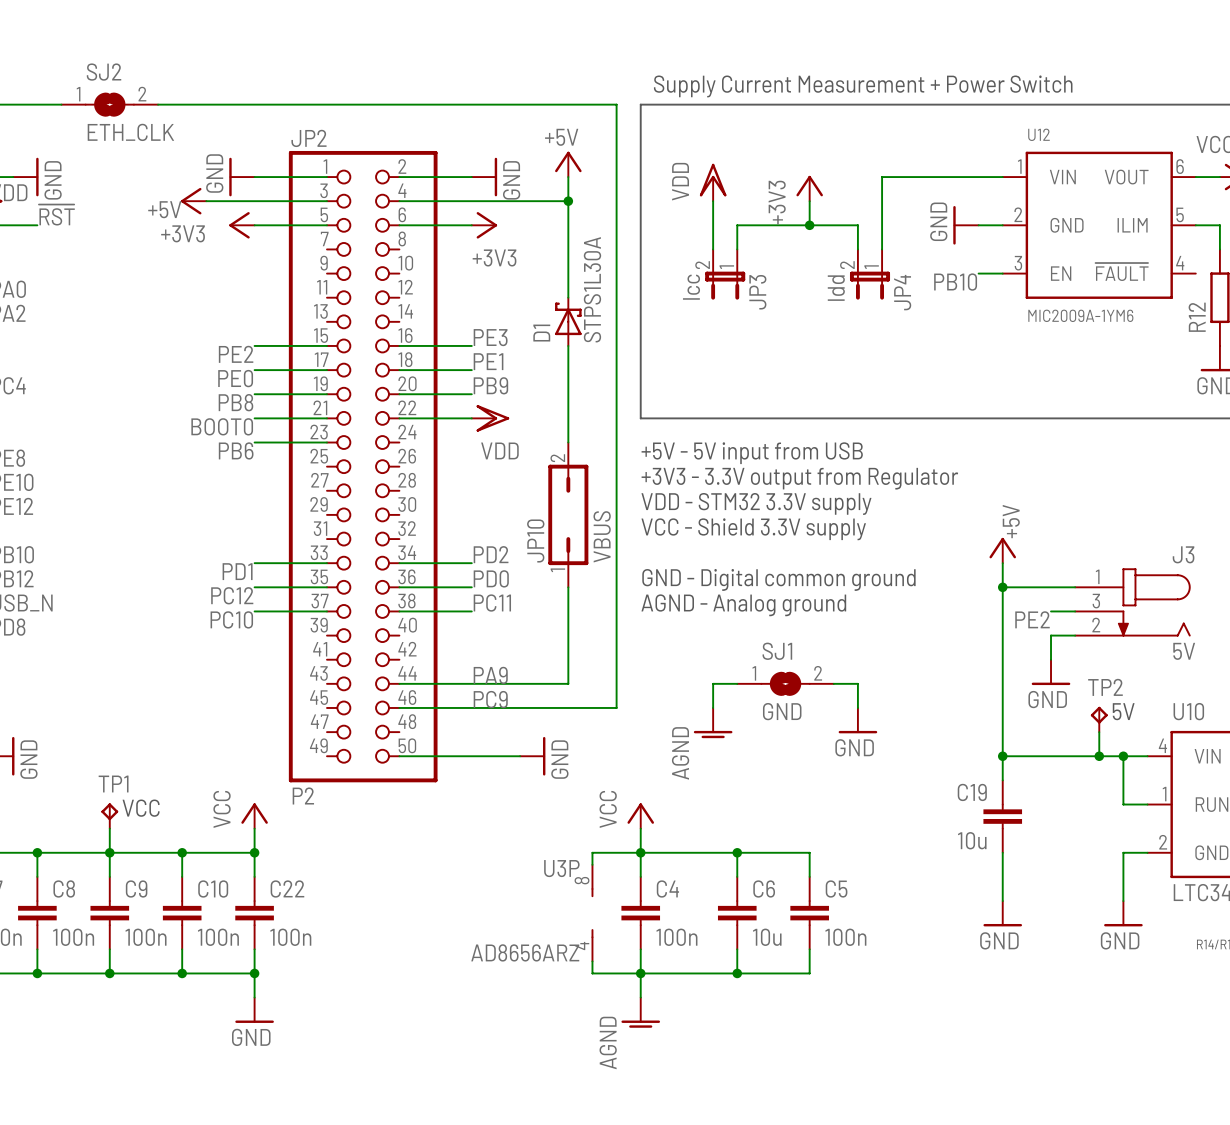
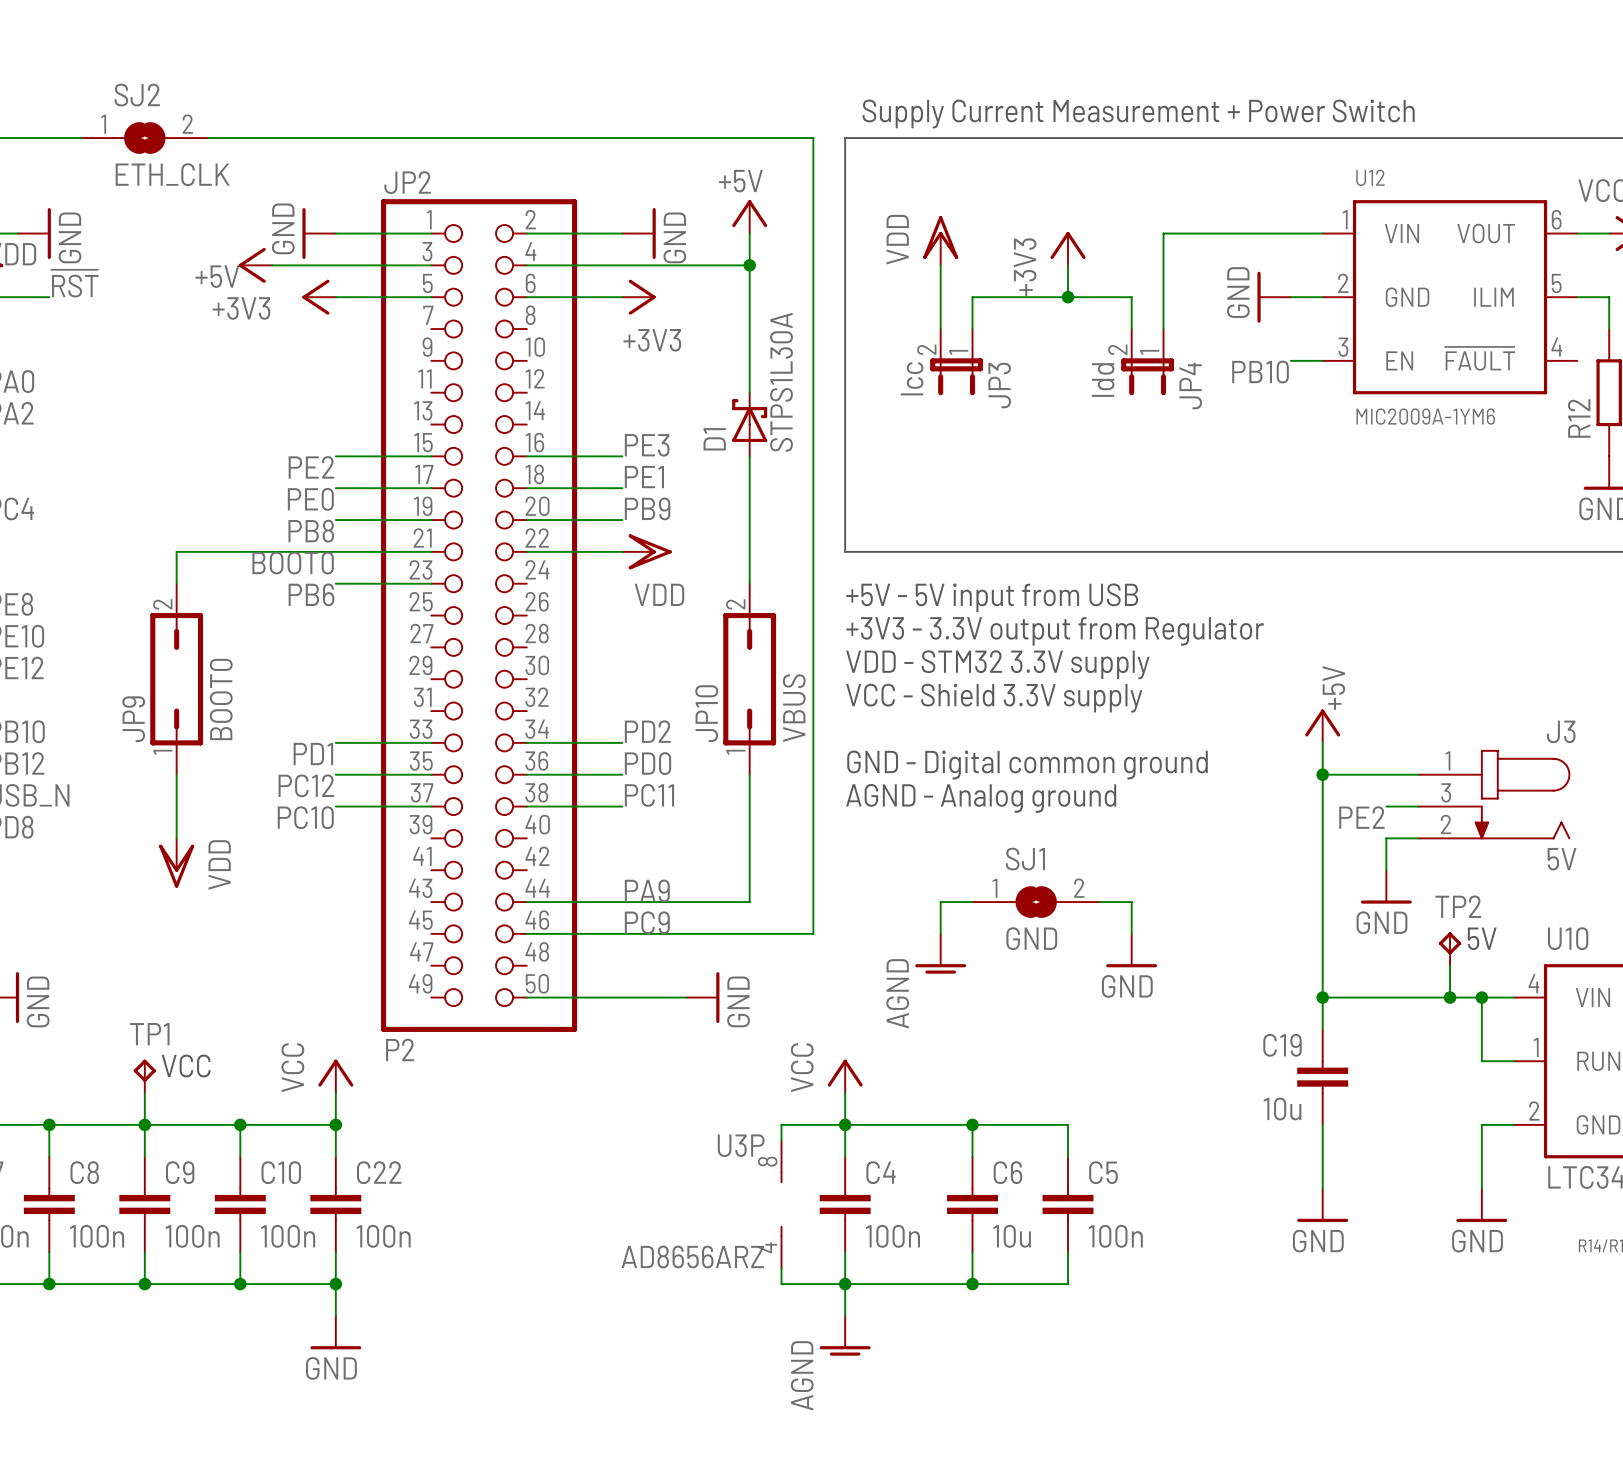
wire: none -> (335, 551) (176, 551) (176, 583)
JP9: none -> BOOT0 (176, 679)
wire: none -> (176, 774) (176, 838)
power symbol: none -> VDD (176, 863)

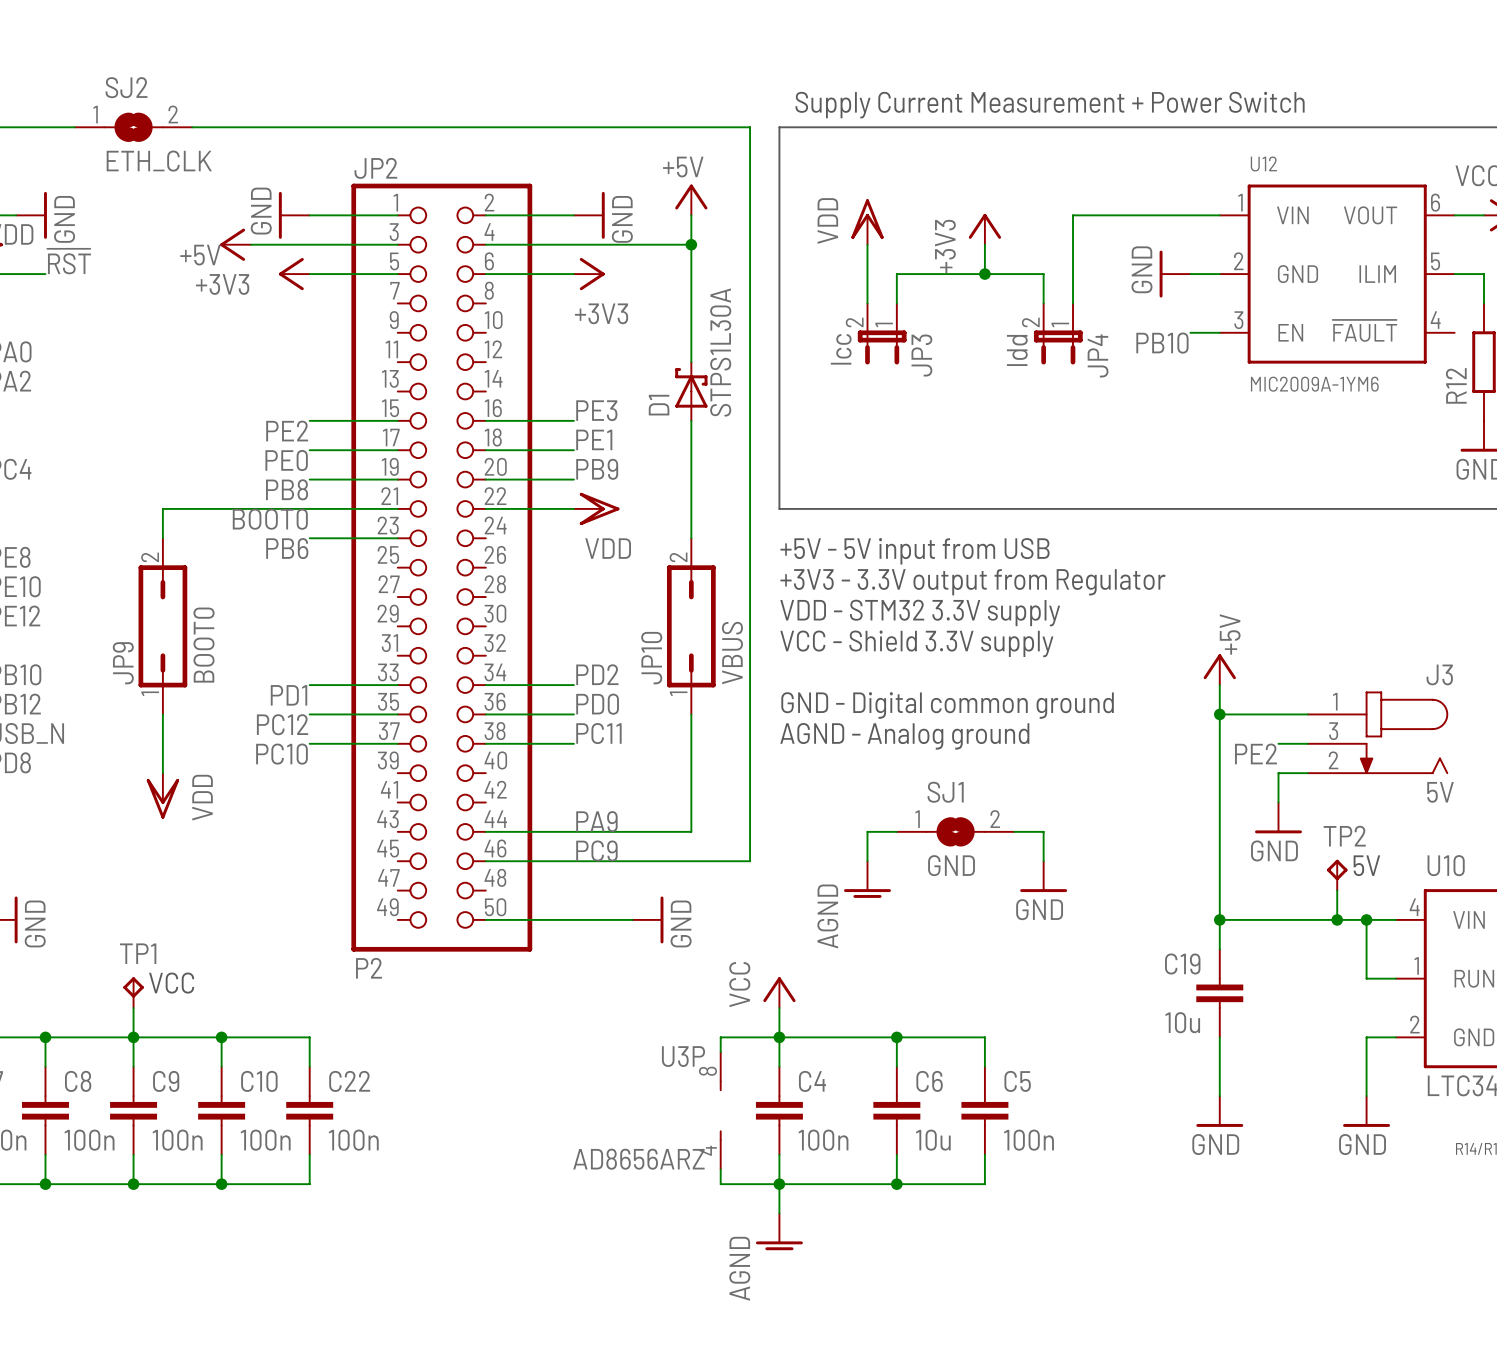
power symbol: VCC (335, 1076) -> none
wire: (335, 1093) (335, 1124) -> none
junction: (335, 1124) -> none
wire: (335, 1284) (335, 1315) -> none
junction: (335, 1284) -> none
power symbol: GND (335, 1332) -> none

